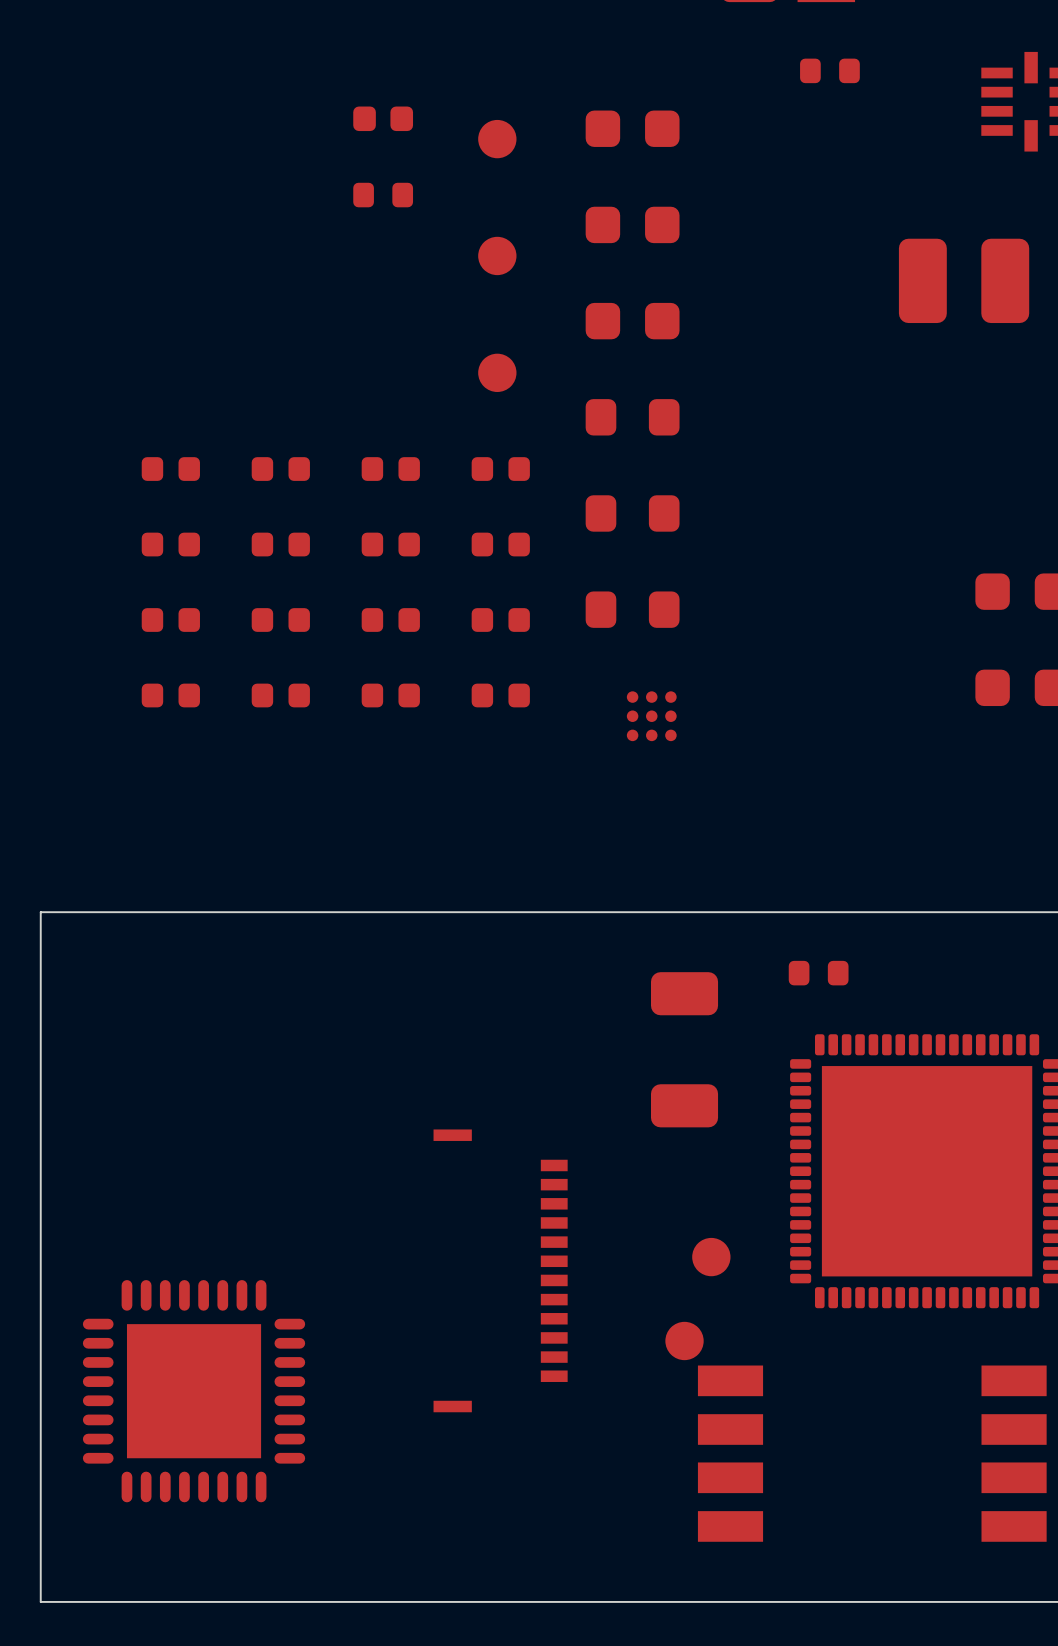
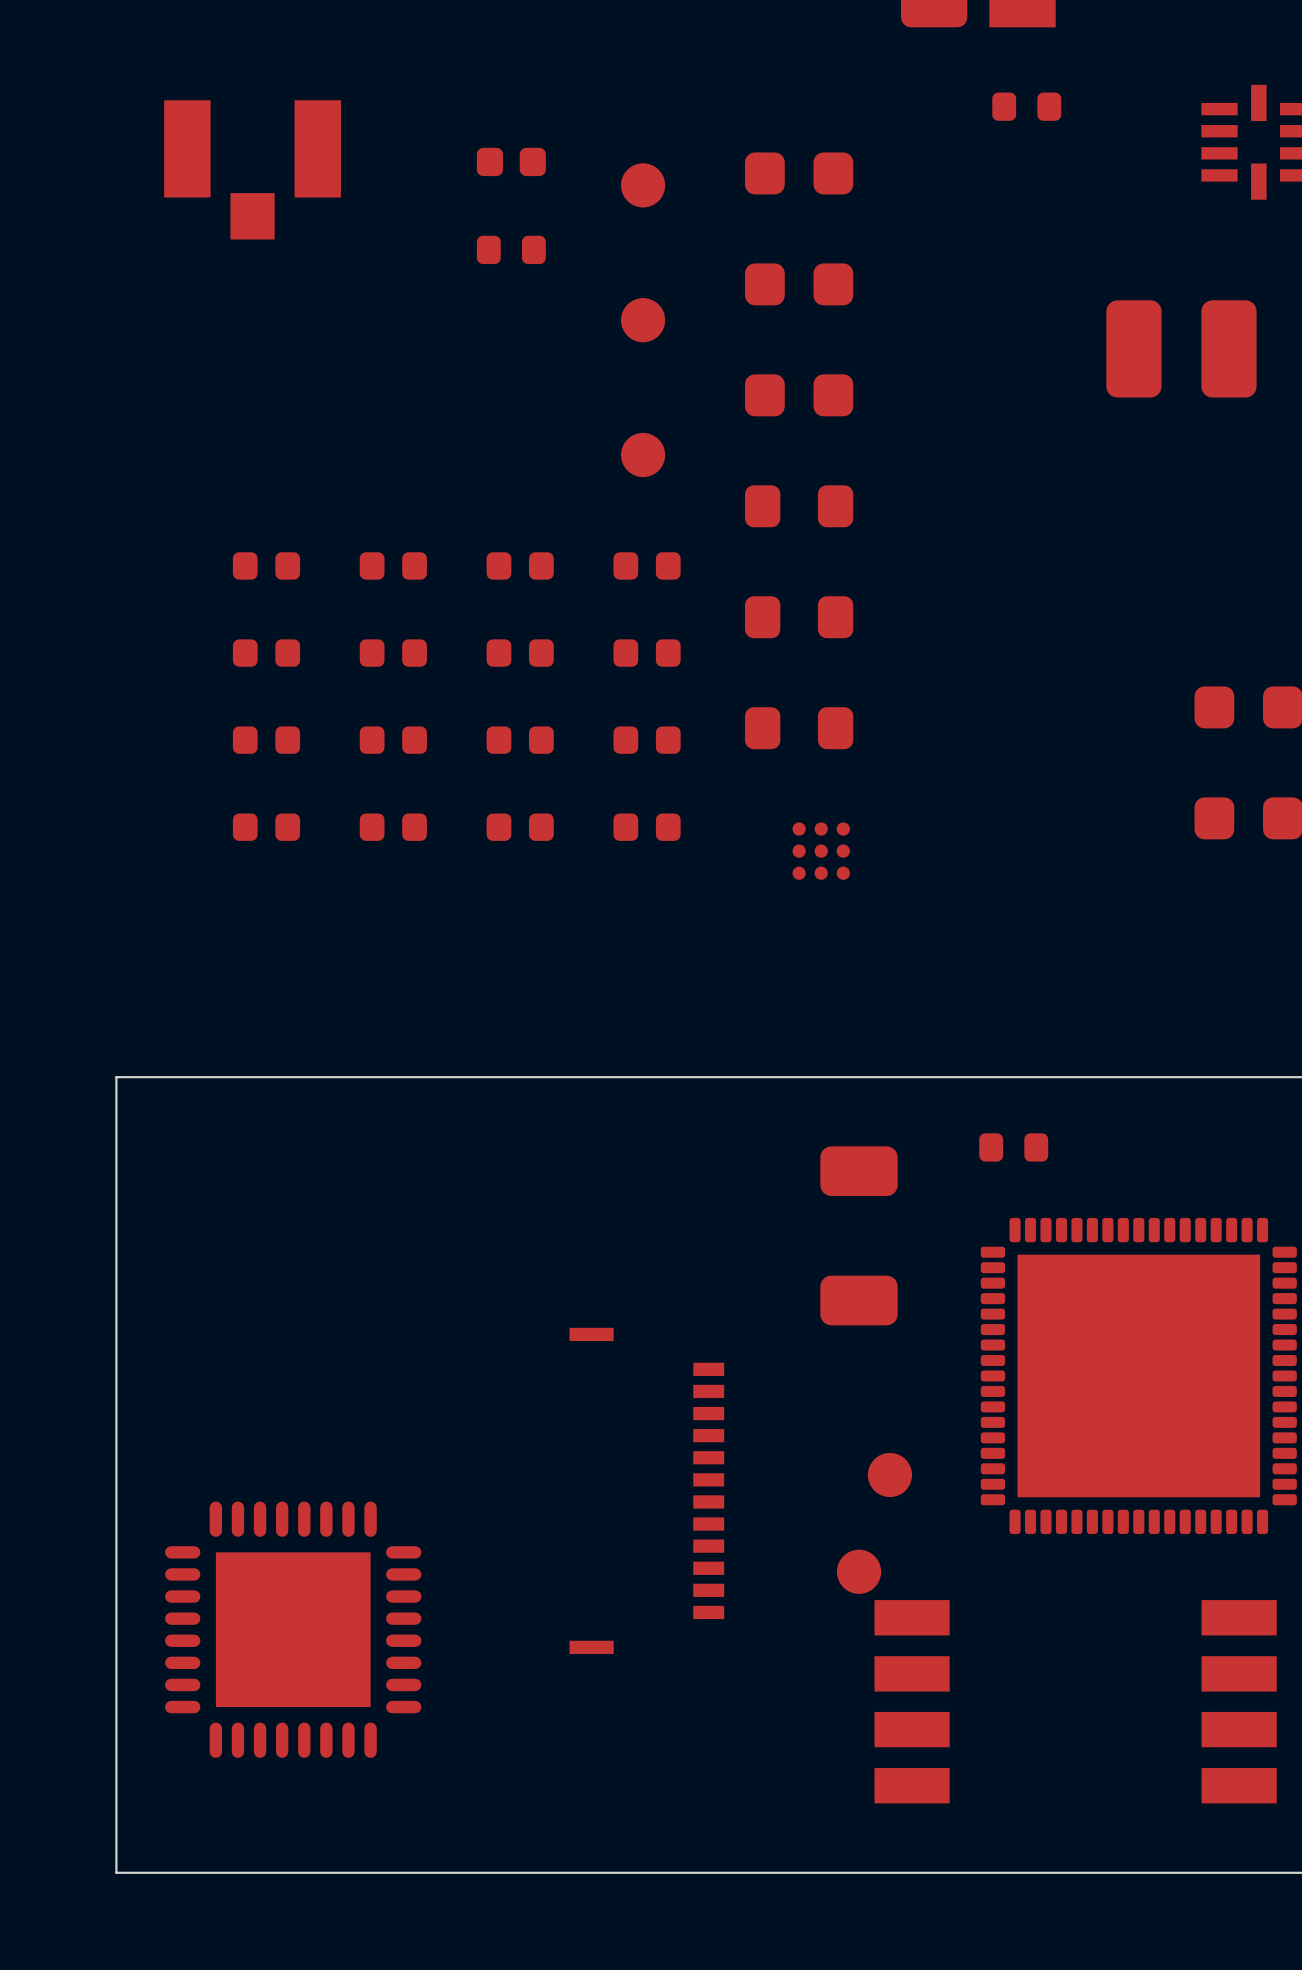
part: none -> (252, 169)

